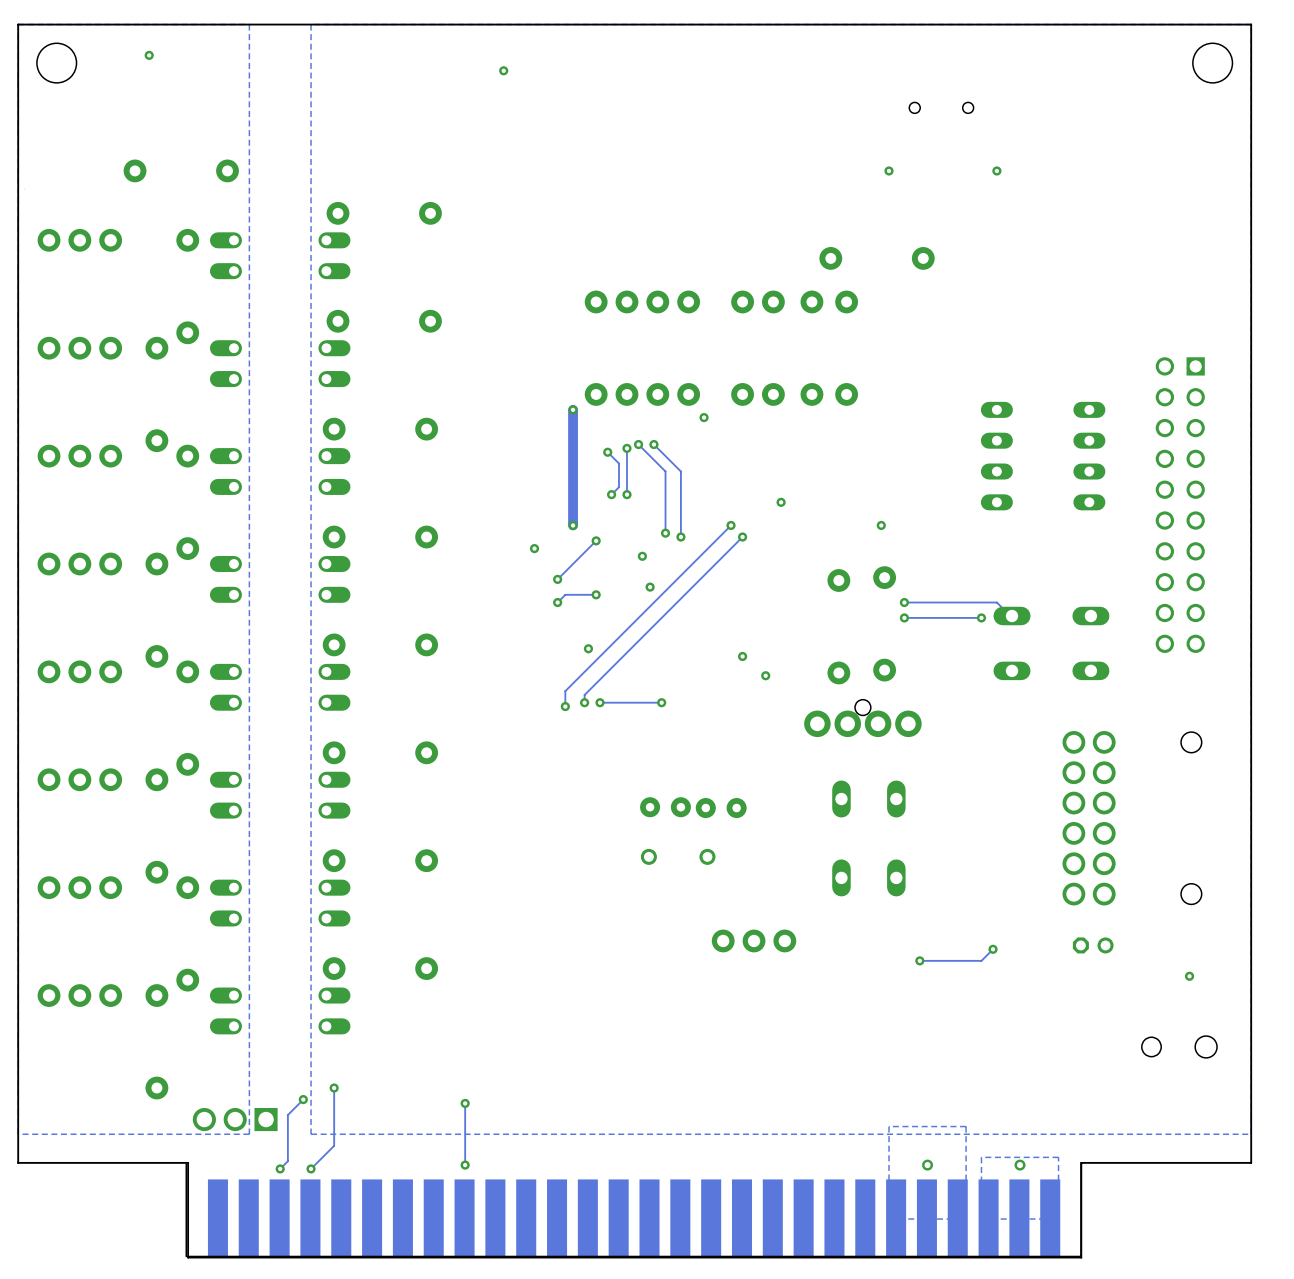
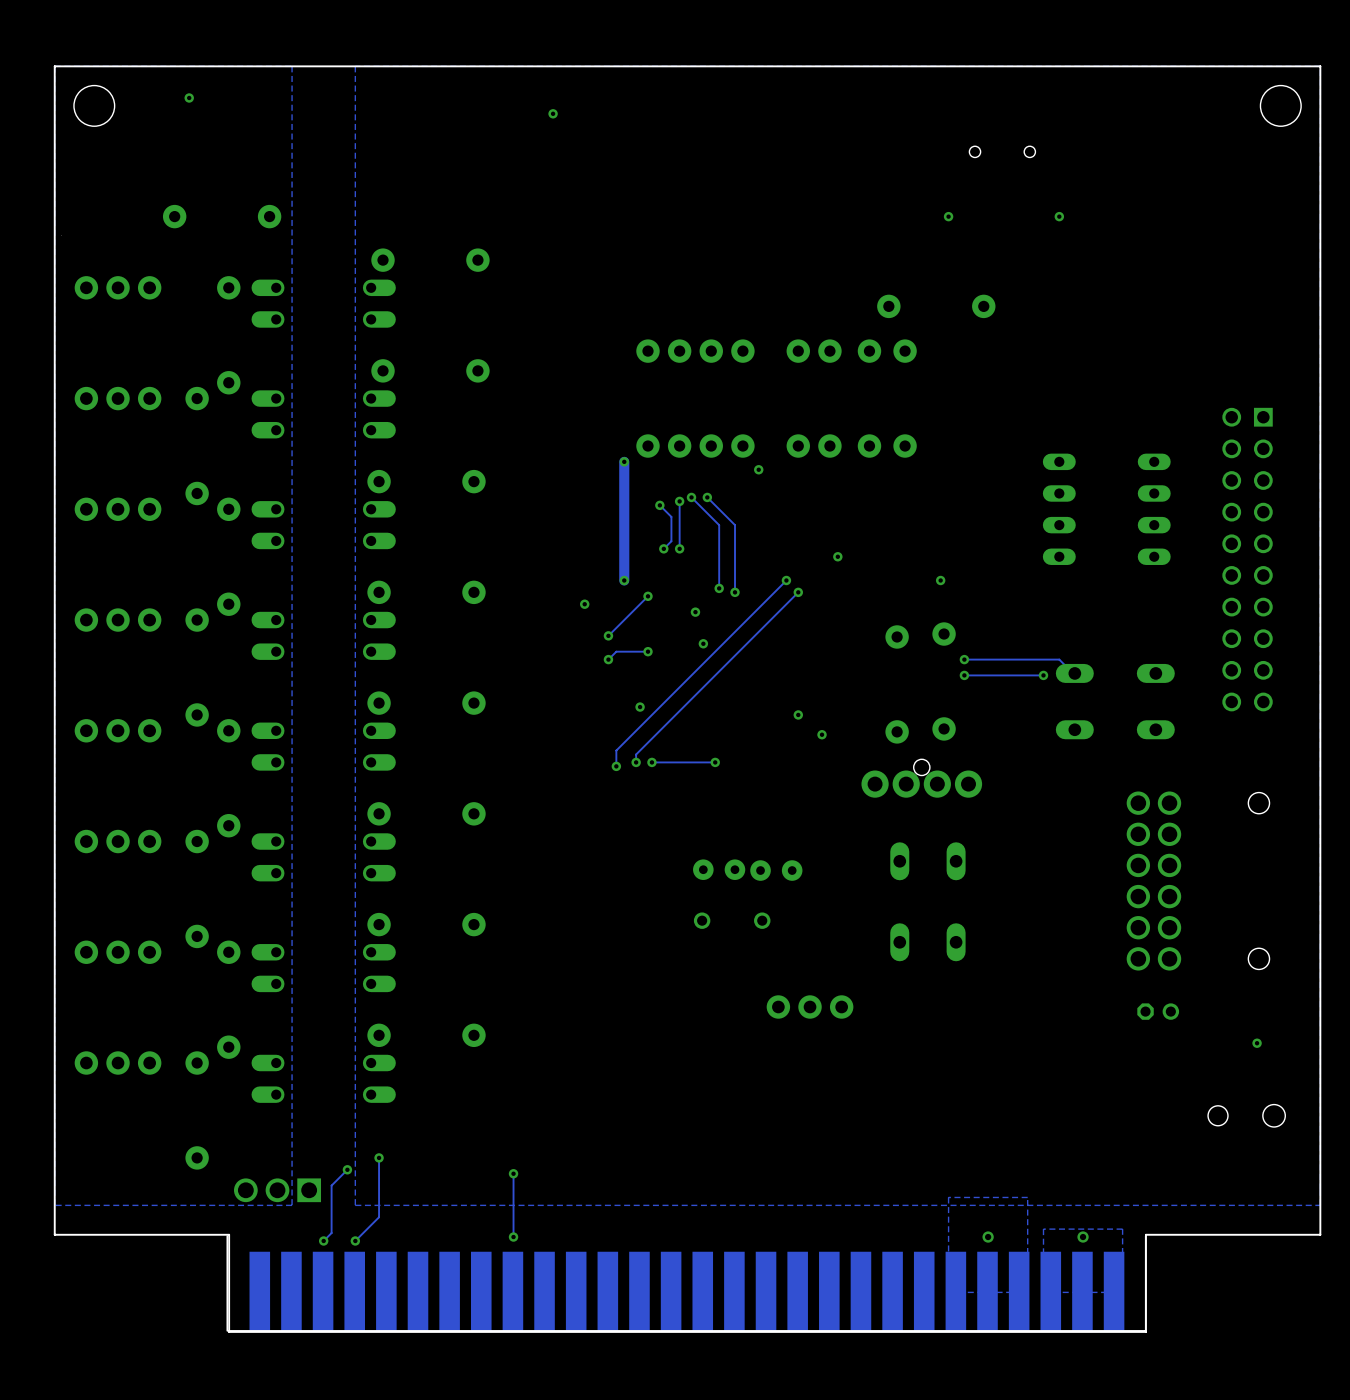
track: (993, 949) (981, 960) (919, 960) -> none
via: (993, 949) -> none
via: (919, 960) -> none

